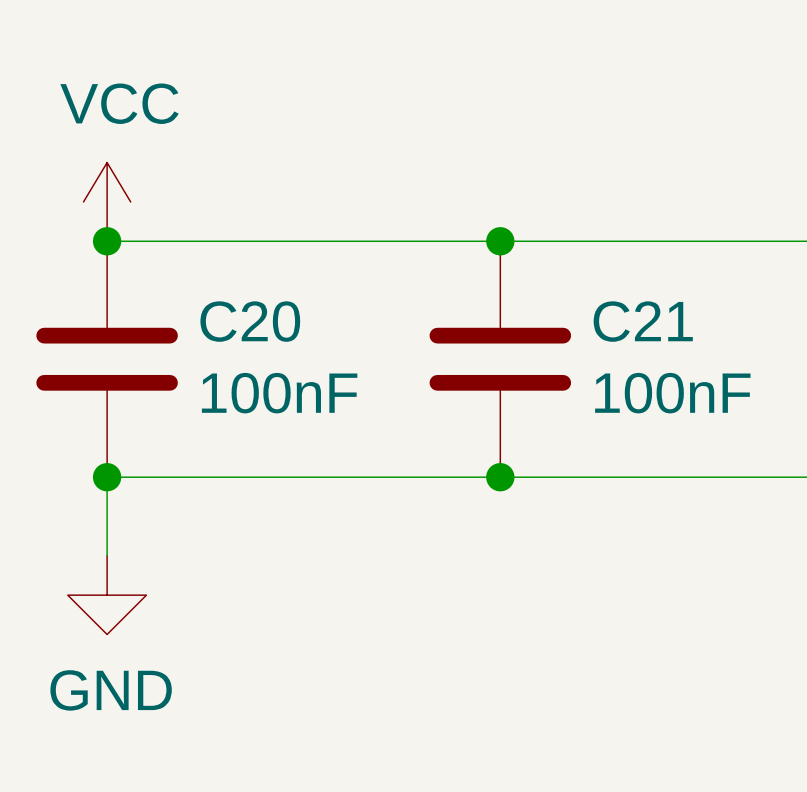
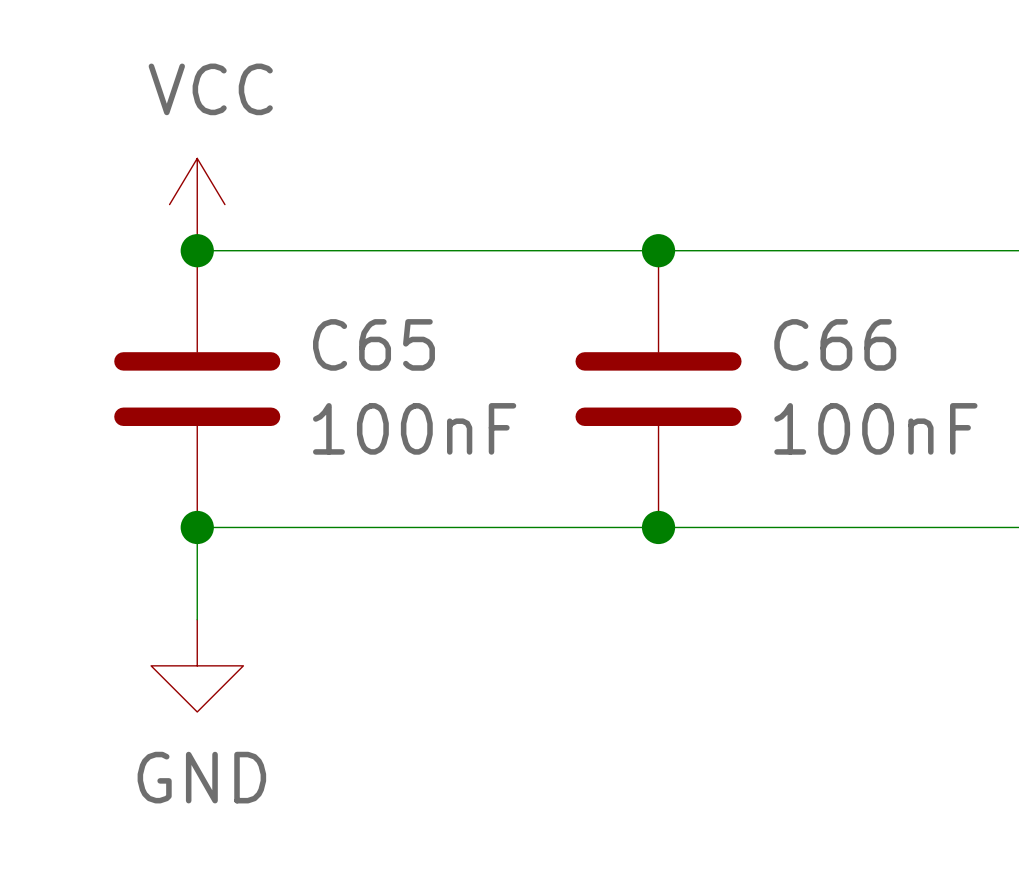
C20 name: C20 (250, 321) -> C65 (373, 344)
C21 name: C21 (643, 321) -> C66 (835, 344)

